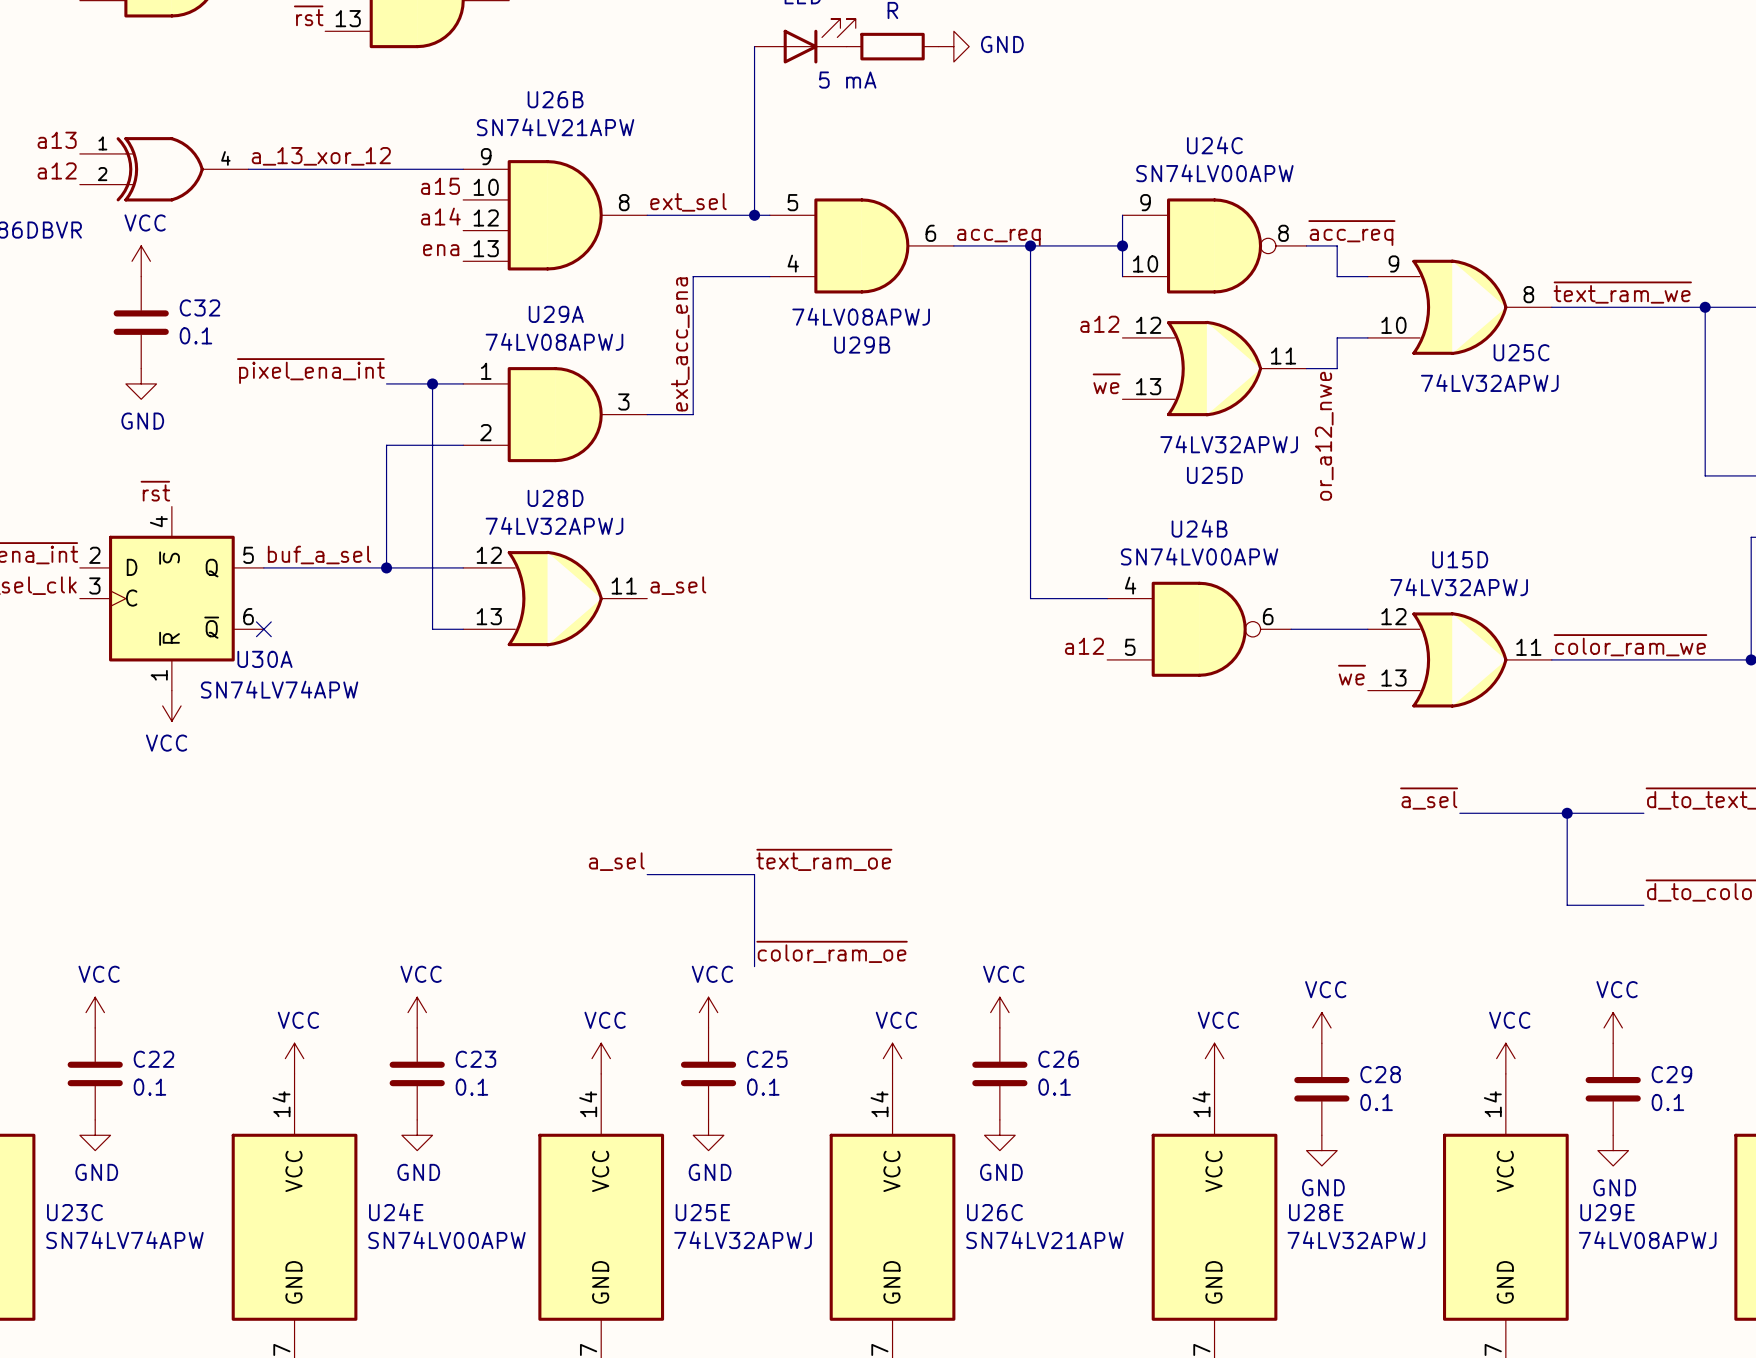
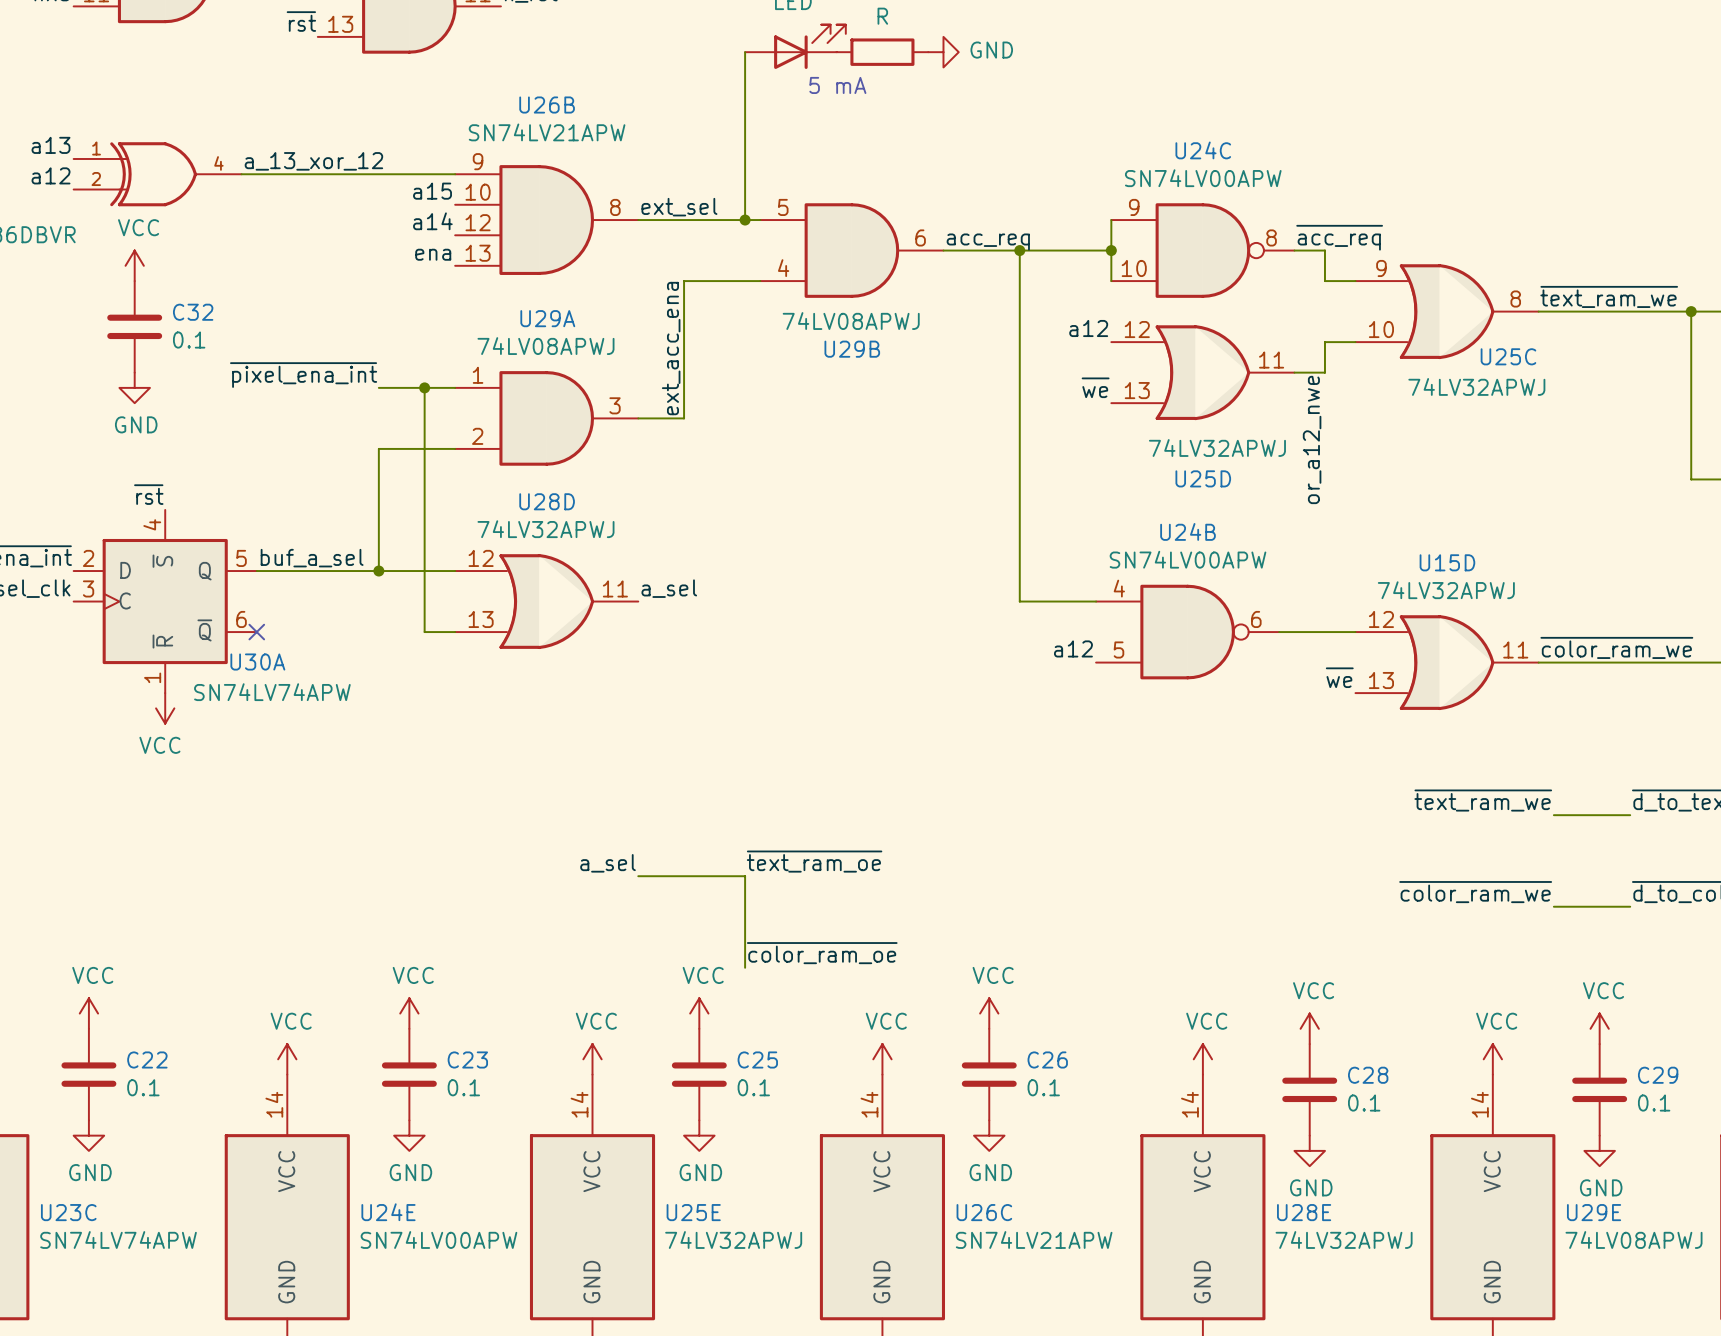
label: ~{a_sel} (1429, 798) -> none
label: none -> ~{text_ram_we} (1483, 800)
wire: (1459, 813) (1567, 813) (1567, 905) -> none
junction: (1567, 813) -> none
label: none -> ~{color_ram_we} (1475, 892)

